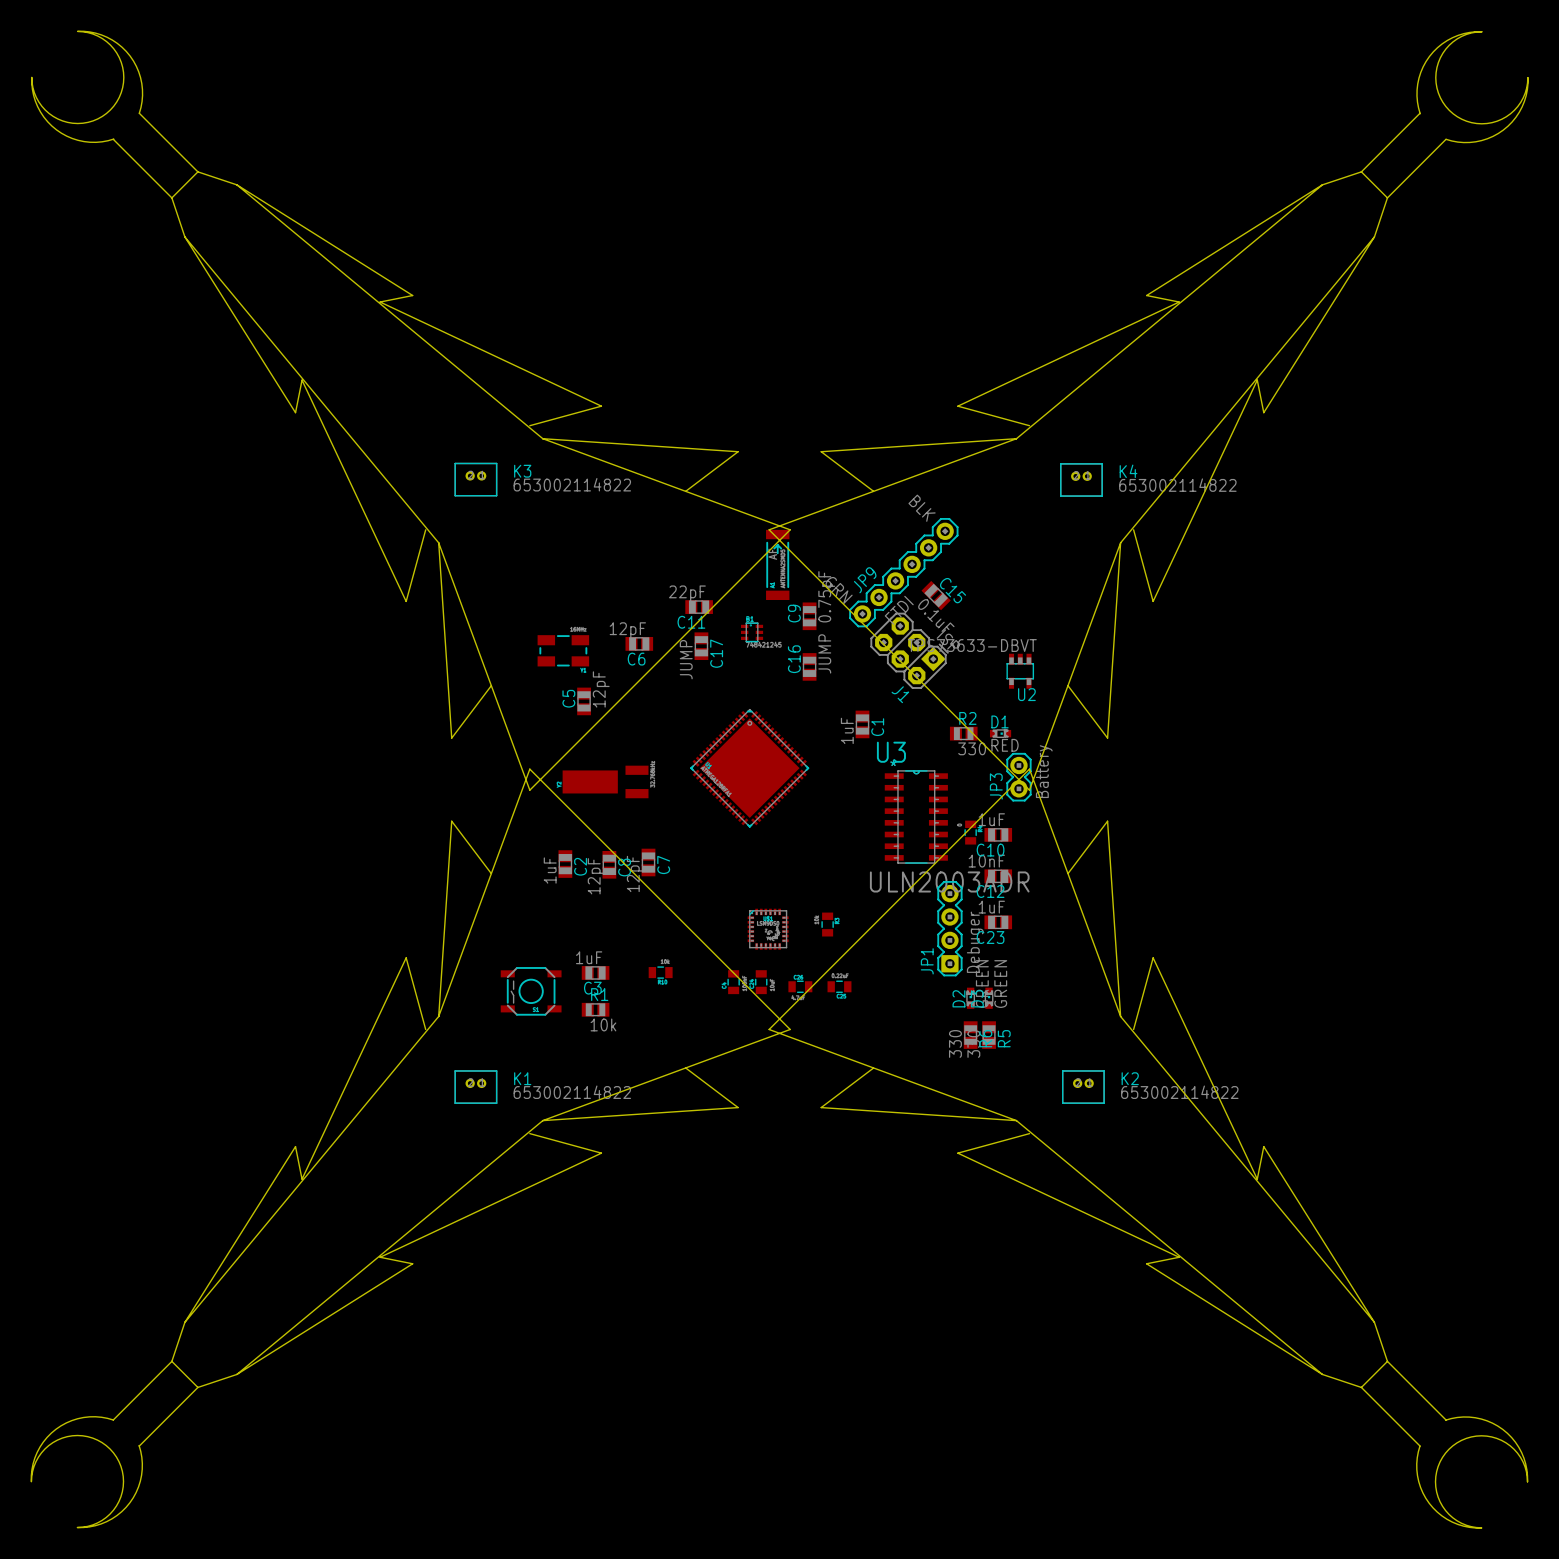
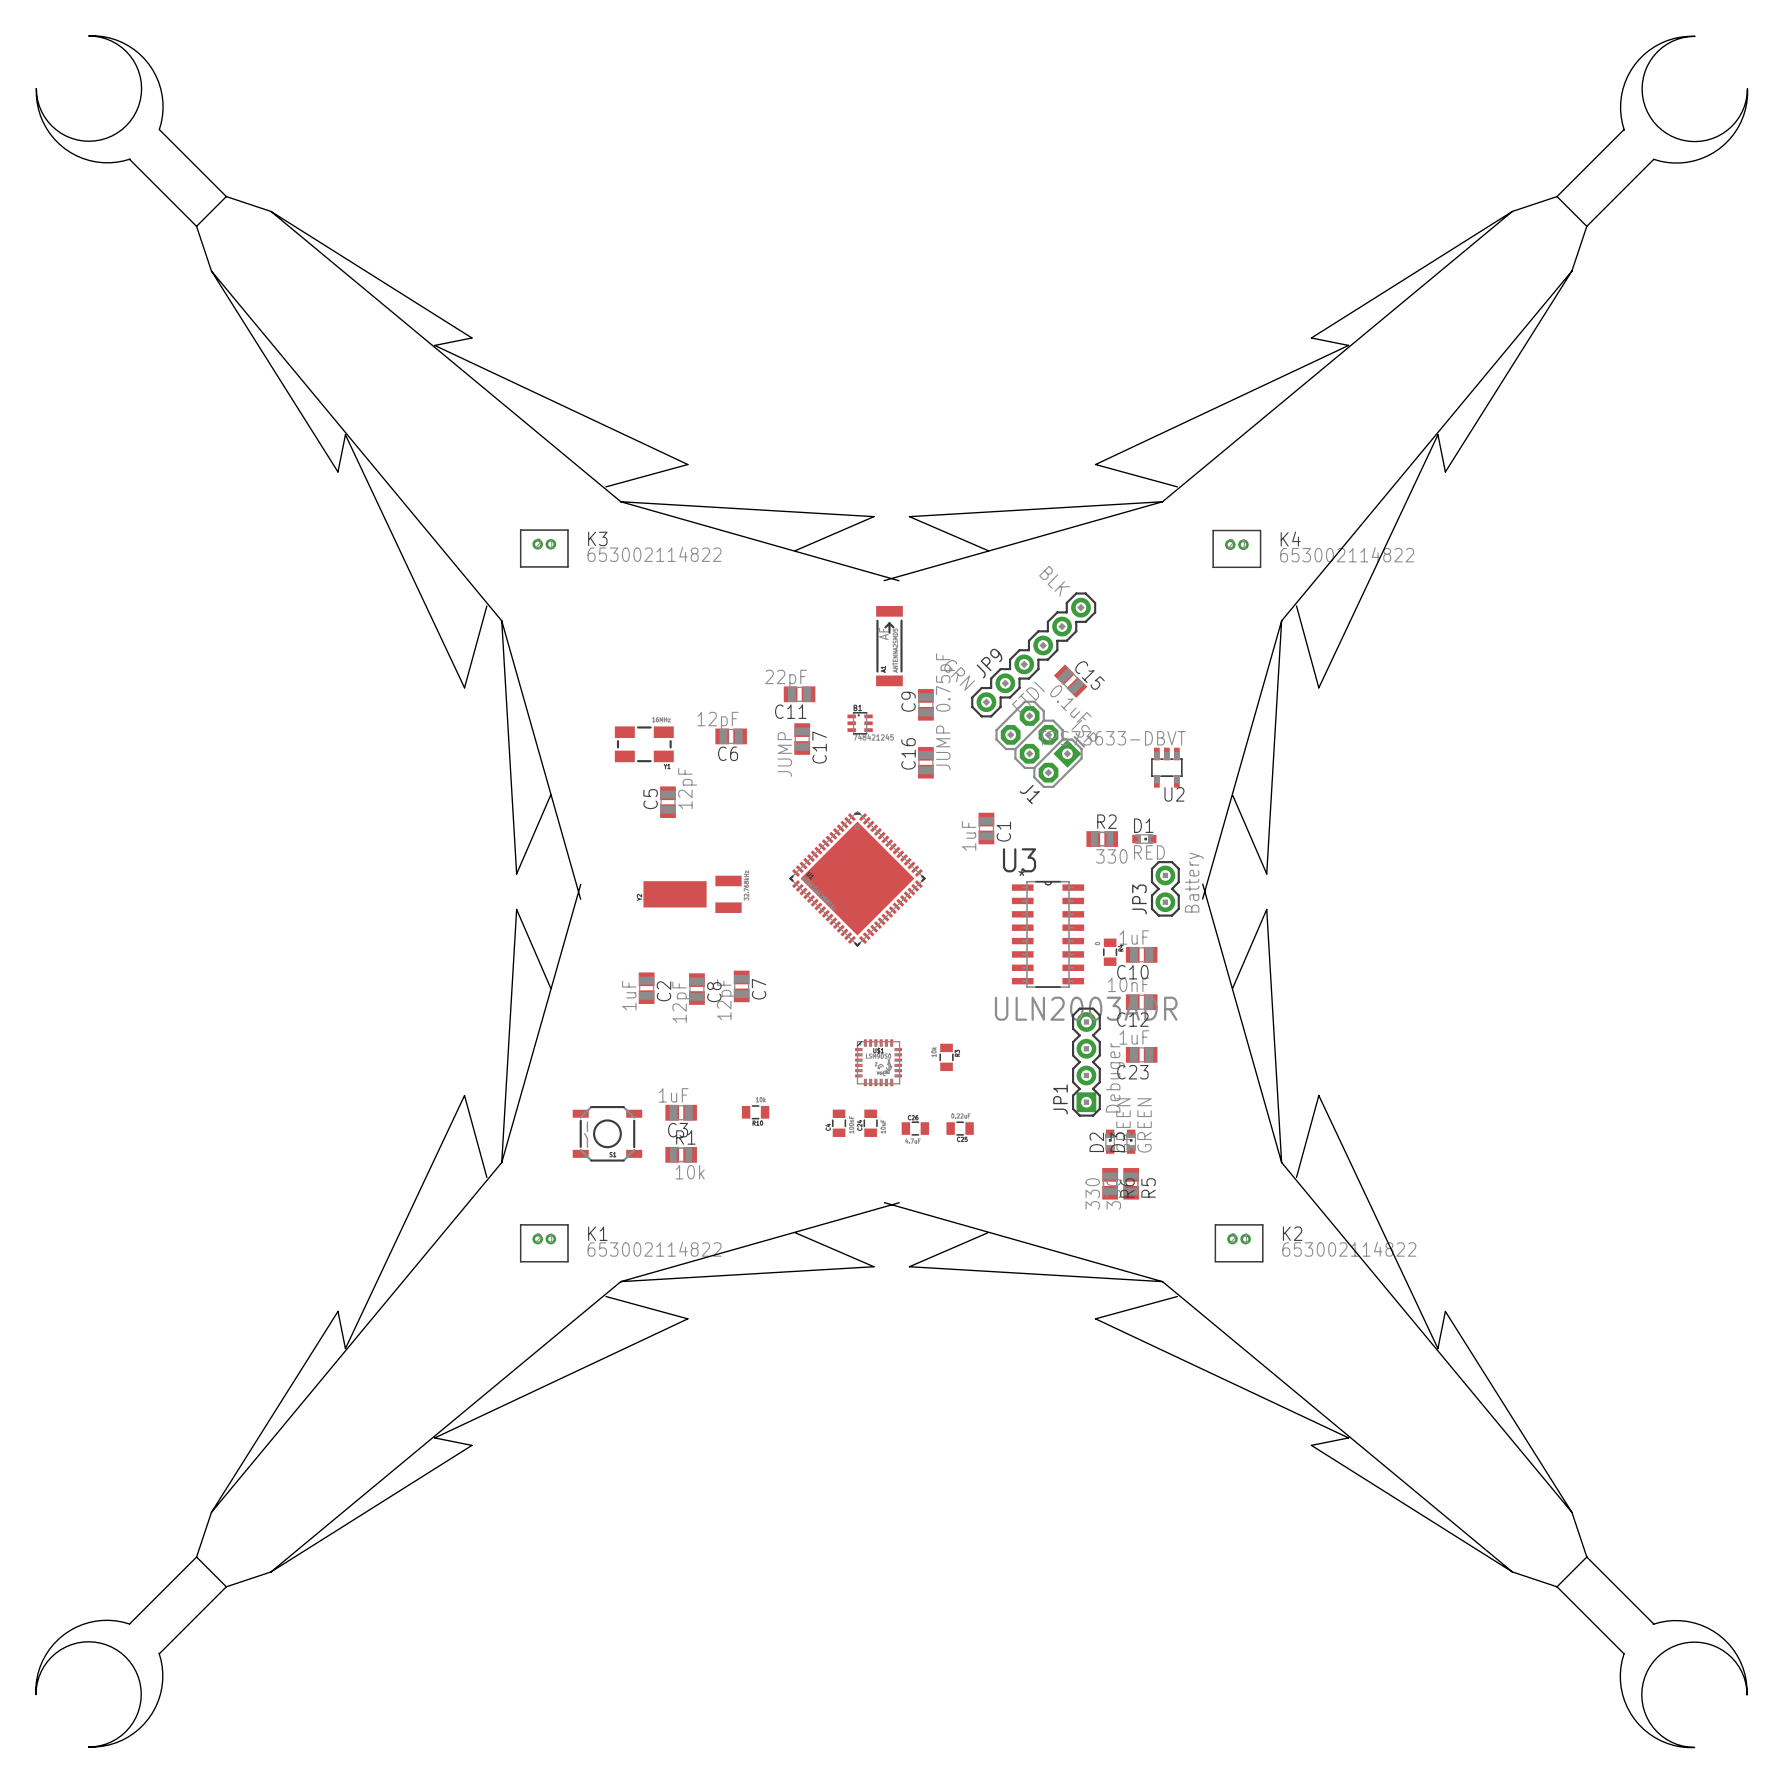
drawing shape: [31, 30, 791, 791] -> [35, 35, 900, 900]
drawing shape: [768, 31, 1529, 791] -> [883, 35, 1749, 900]
drawing shape: [30, 768, 791, 1529] -> [35, 883, 900, 1748]
drawing shape: [768, 768, 1529, 1529] -> [883, 883, 1748, 1749]

